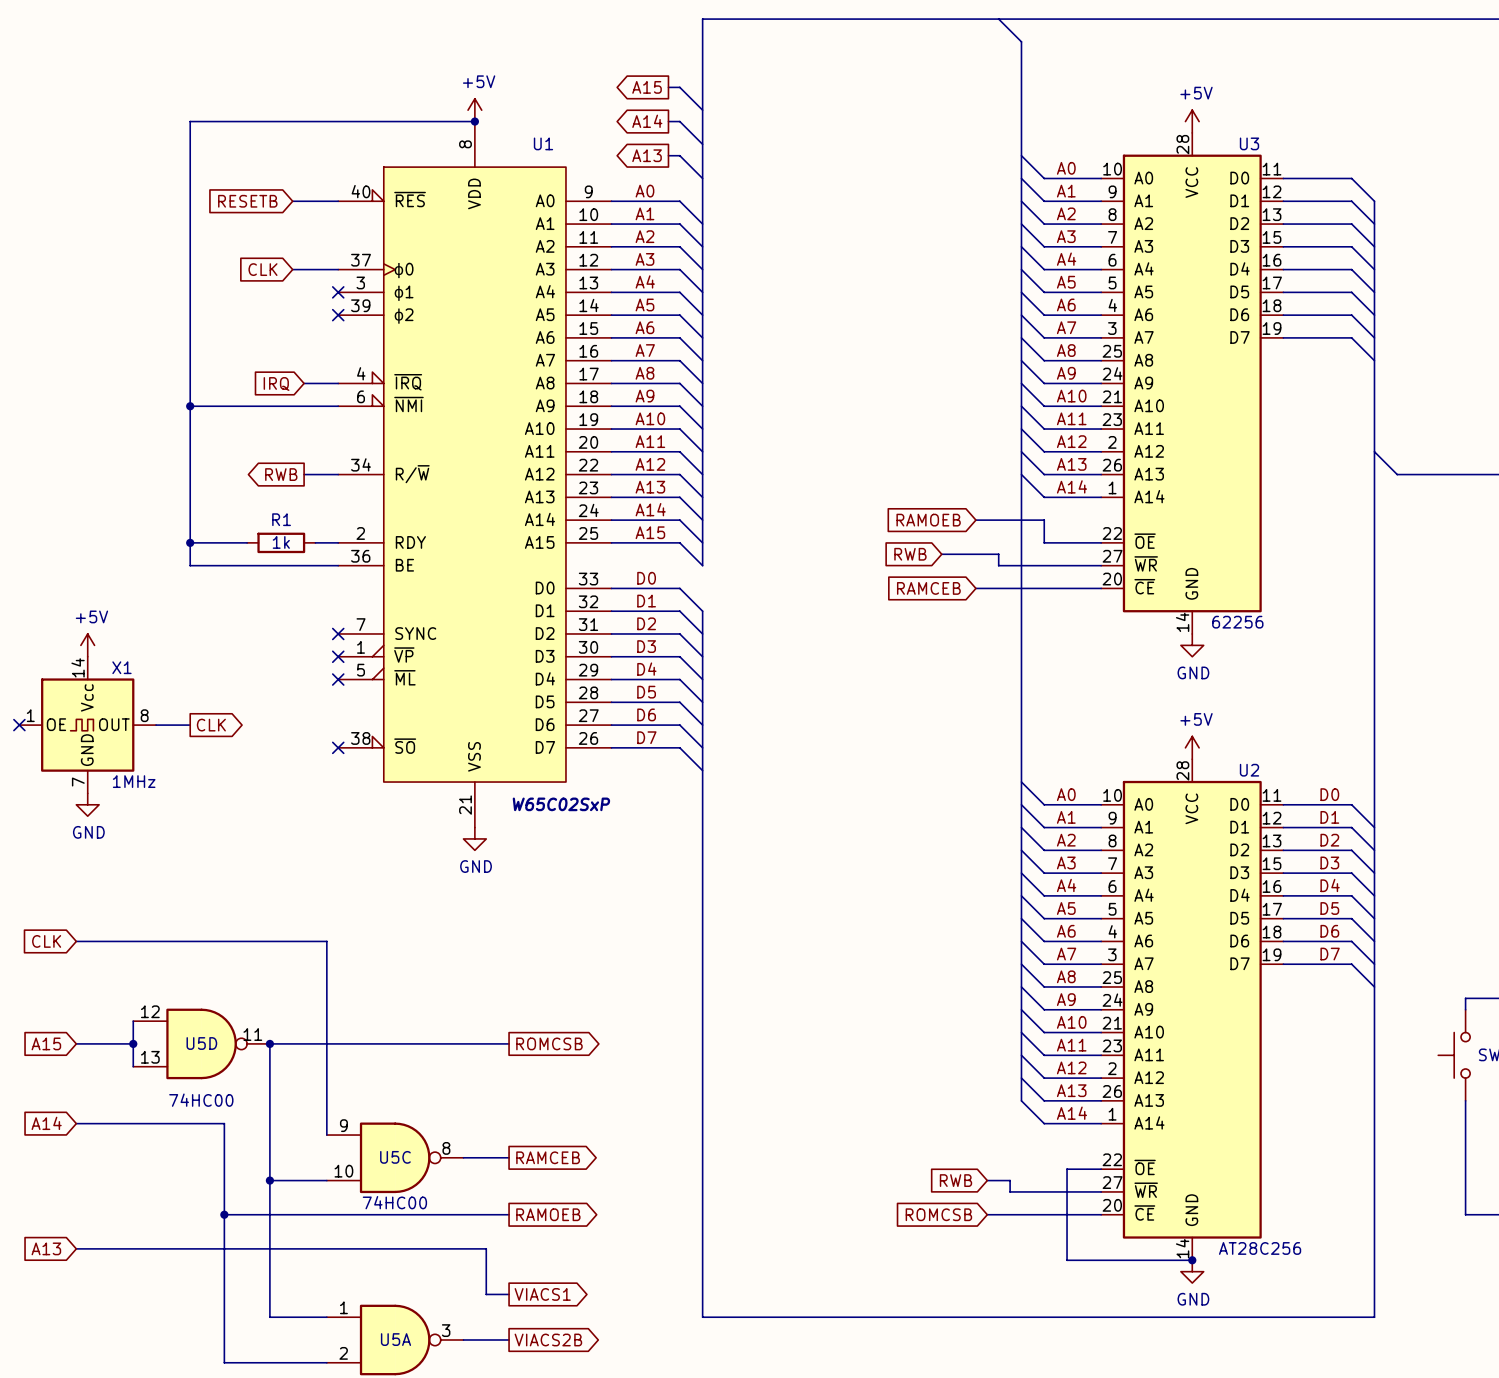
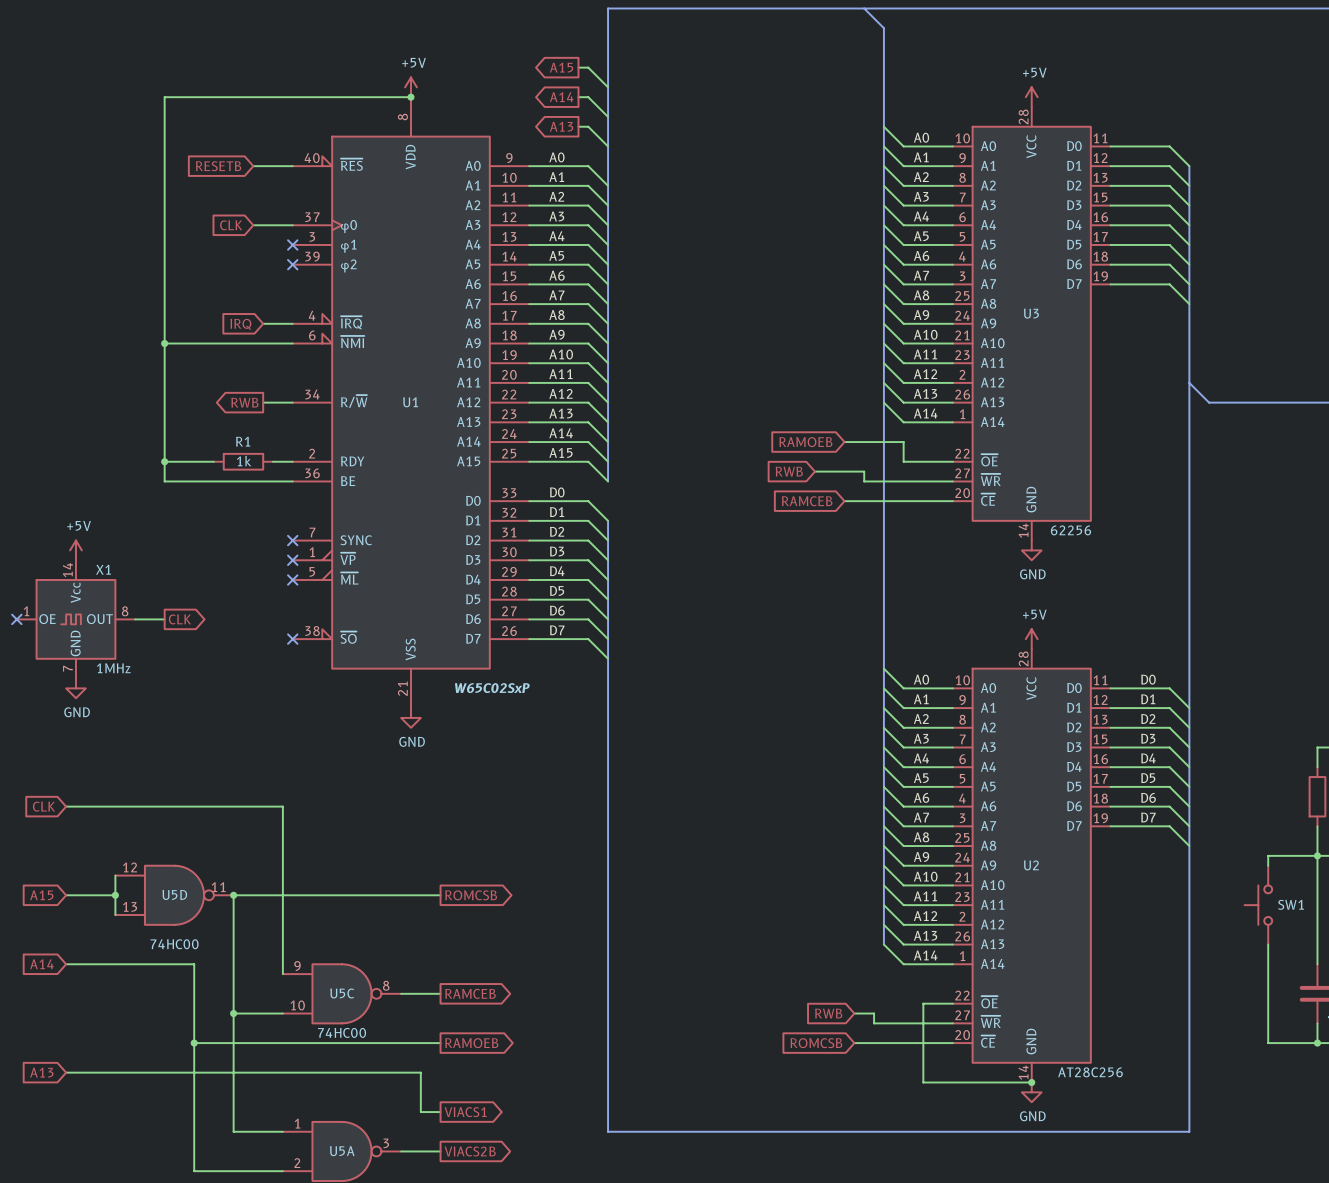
U1 name position: U1 (543, 143) -> U1 (410, 402)
U3 name position: U3 (1249, 143) -> U3 (1031, 313)
U2 name position: U2 (1249, 770) -> U2 (1031, 865)

